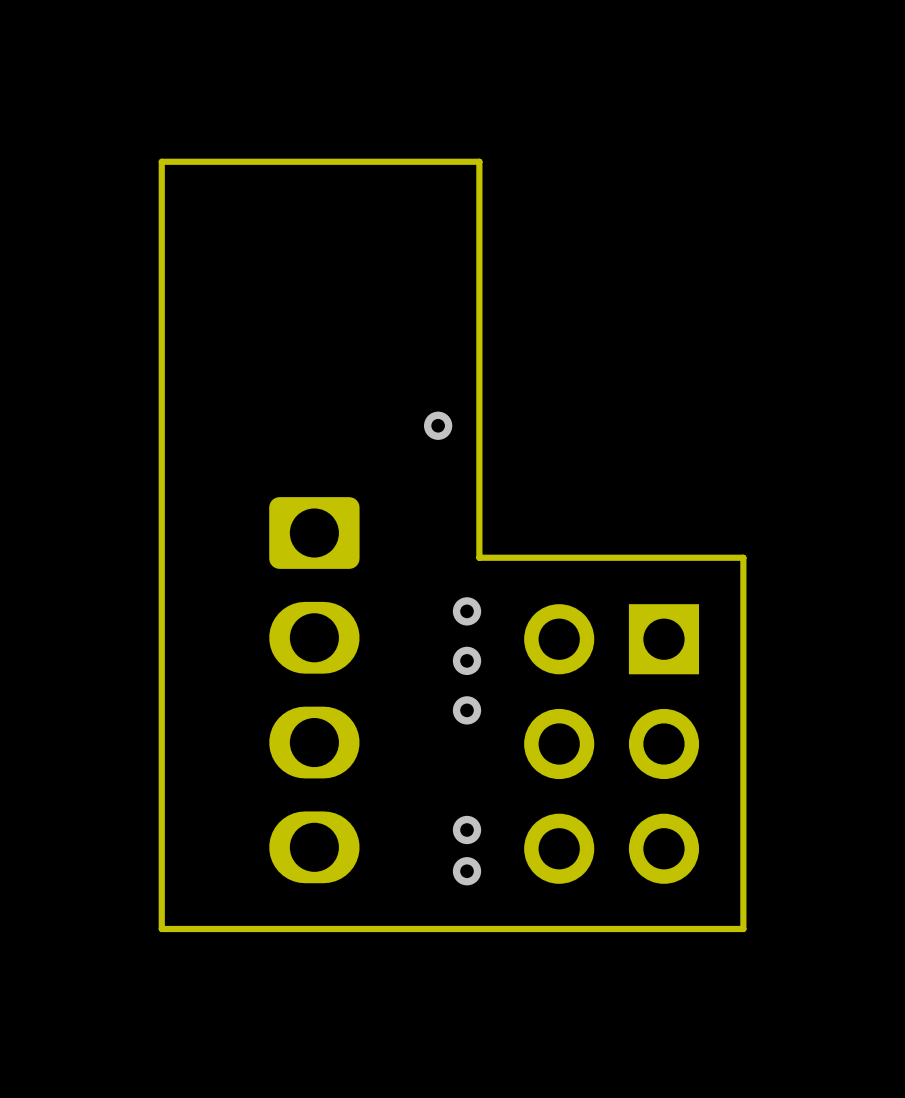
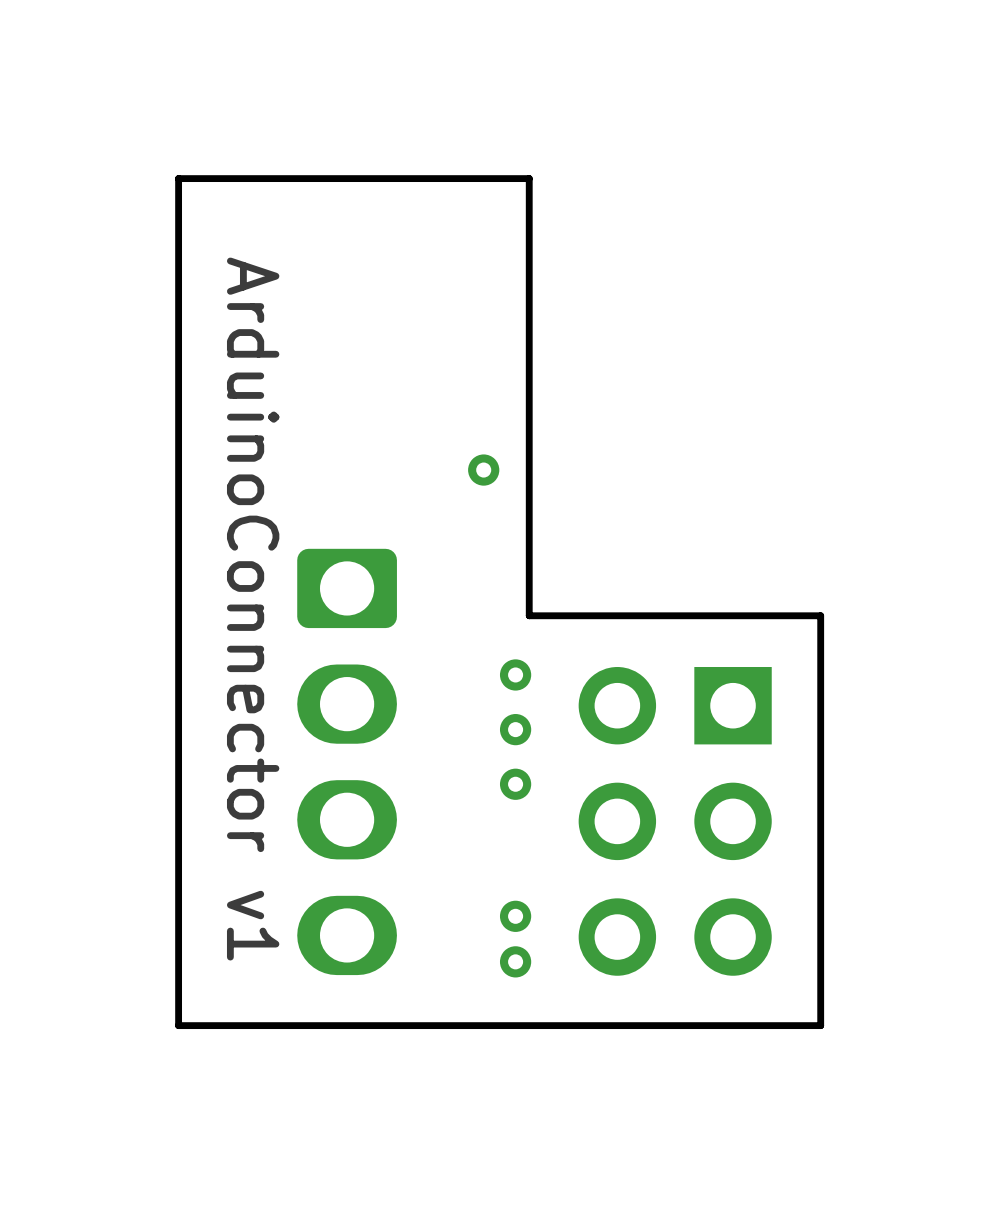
text: none -> ArduinoConnector v1 (253, 609)

